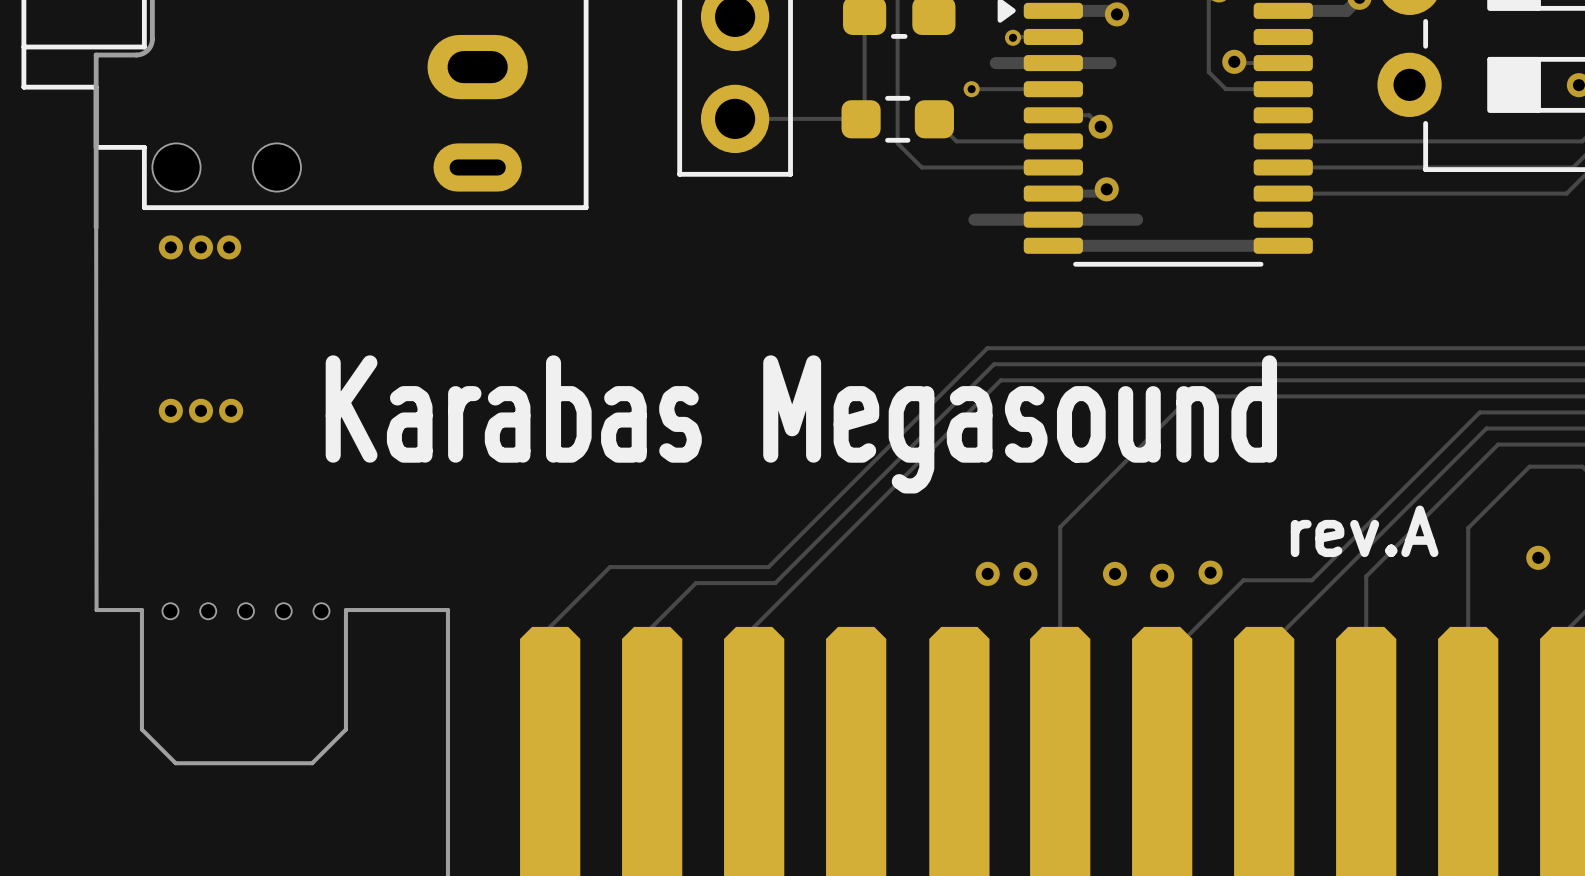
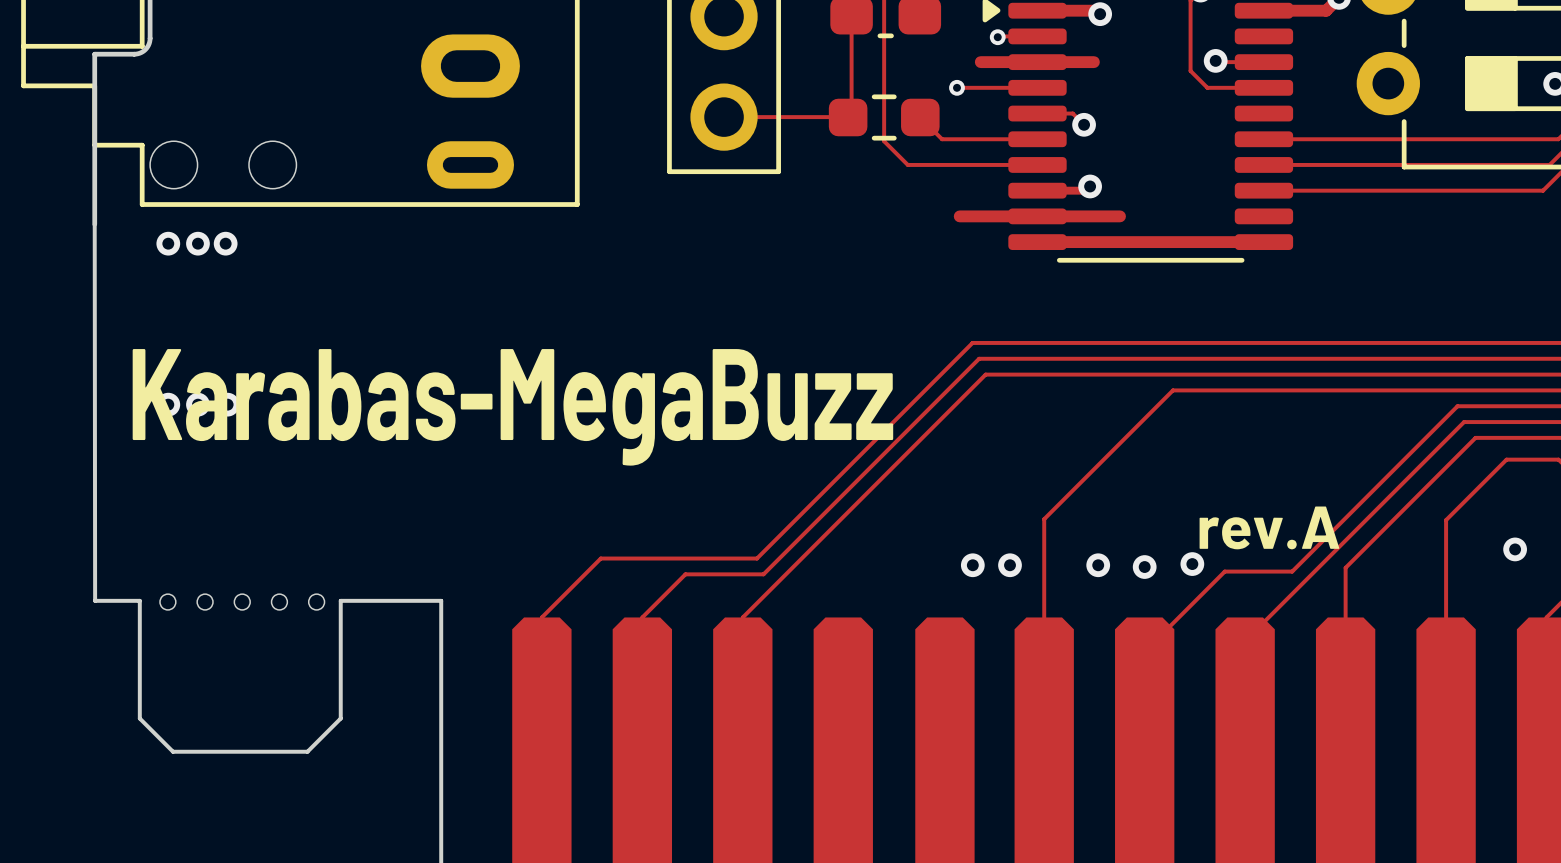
text: Karabas Megasound (801, 424) -> Karabas-MegaBuzz (512, 407)
text position: rev.A (1364, 531) -> rev.A (1269, 527)

